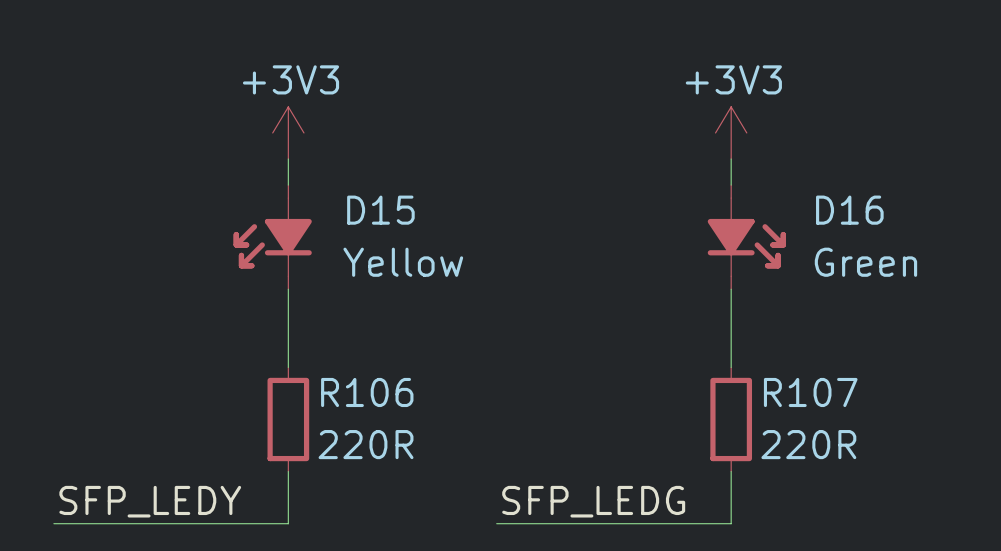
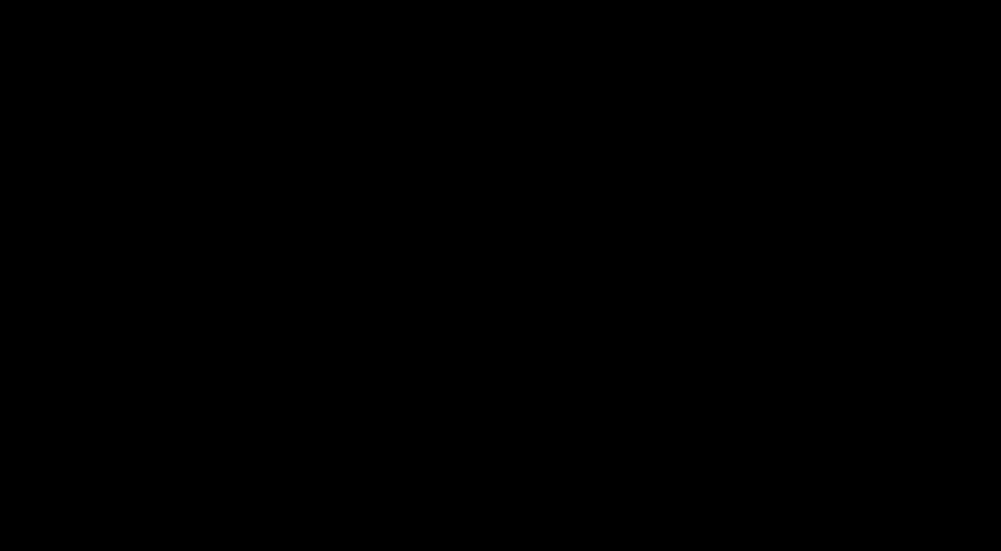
power symbol: +3V3 (288, 132) -> none
power symbol: +3V3 (731, 132) -> none
wire: (288, 159) (288, 185) -> none
wire: (731, 159) (731, 185) -> none
D15: (272, 237) -> none
D16: (746, 237) -> none
wire: (288, 289) (288, 367) -> none
wire: (731, 289) (731, 367) -> none
R106: (288, 419) -> none
R107: (731, 419) -> none
wire: (288, 471) (288, 523) (53, 523) -> none
wire: (731, 471) (731, 523) (496, 523) -> none
label: SFP_LEDY (150, 501) -> none
label: SFP_LEDG (593, 501) -> none

